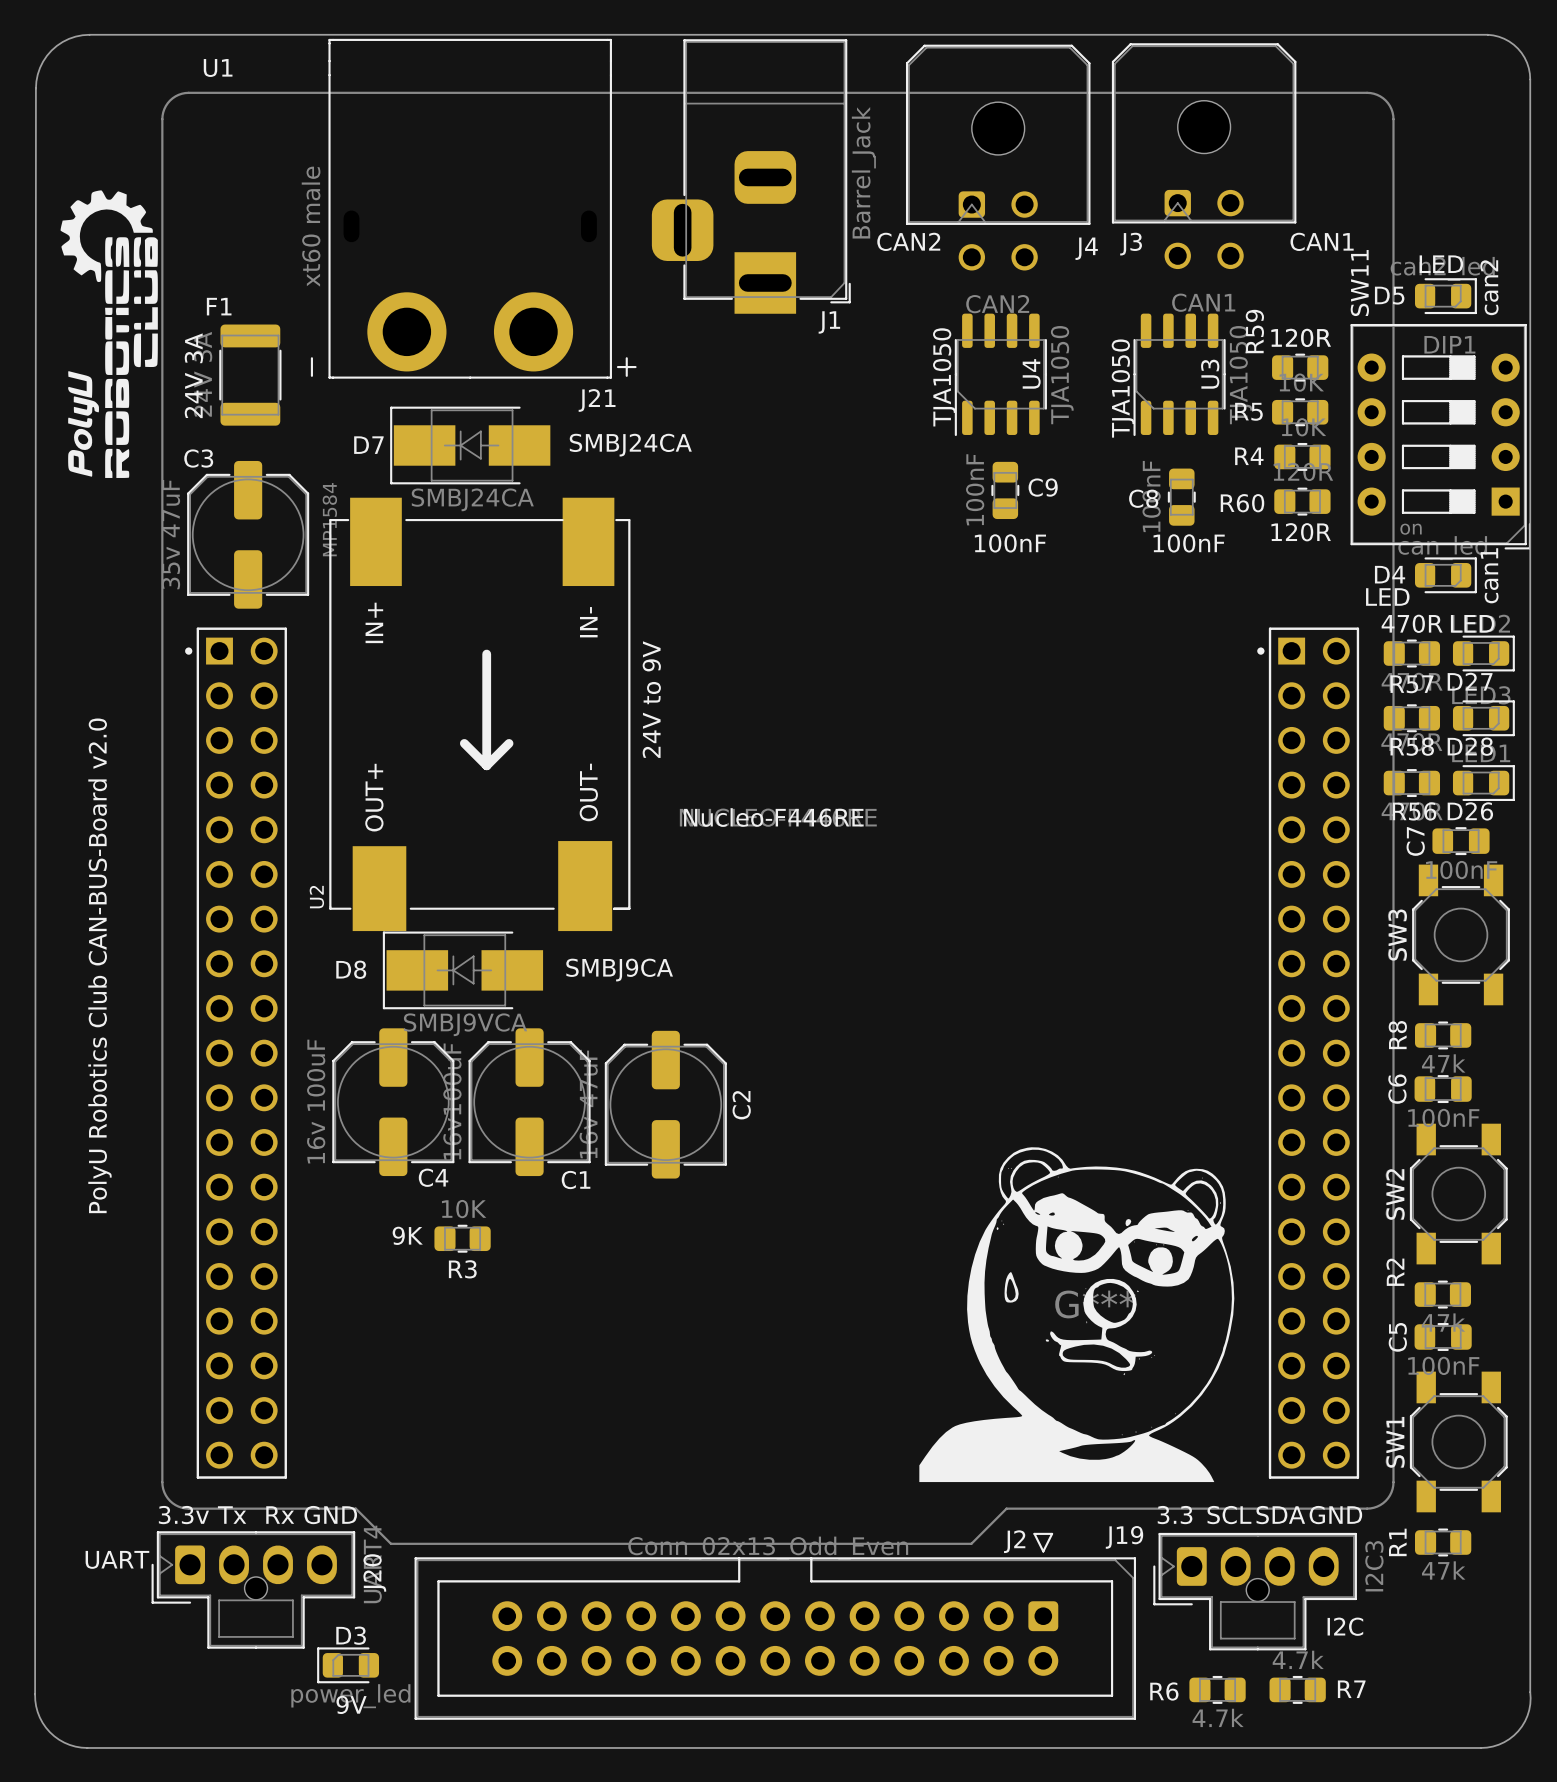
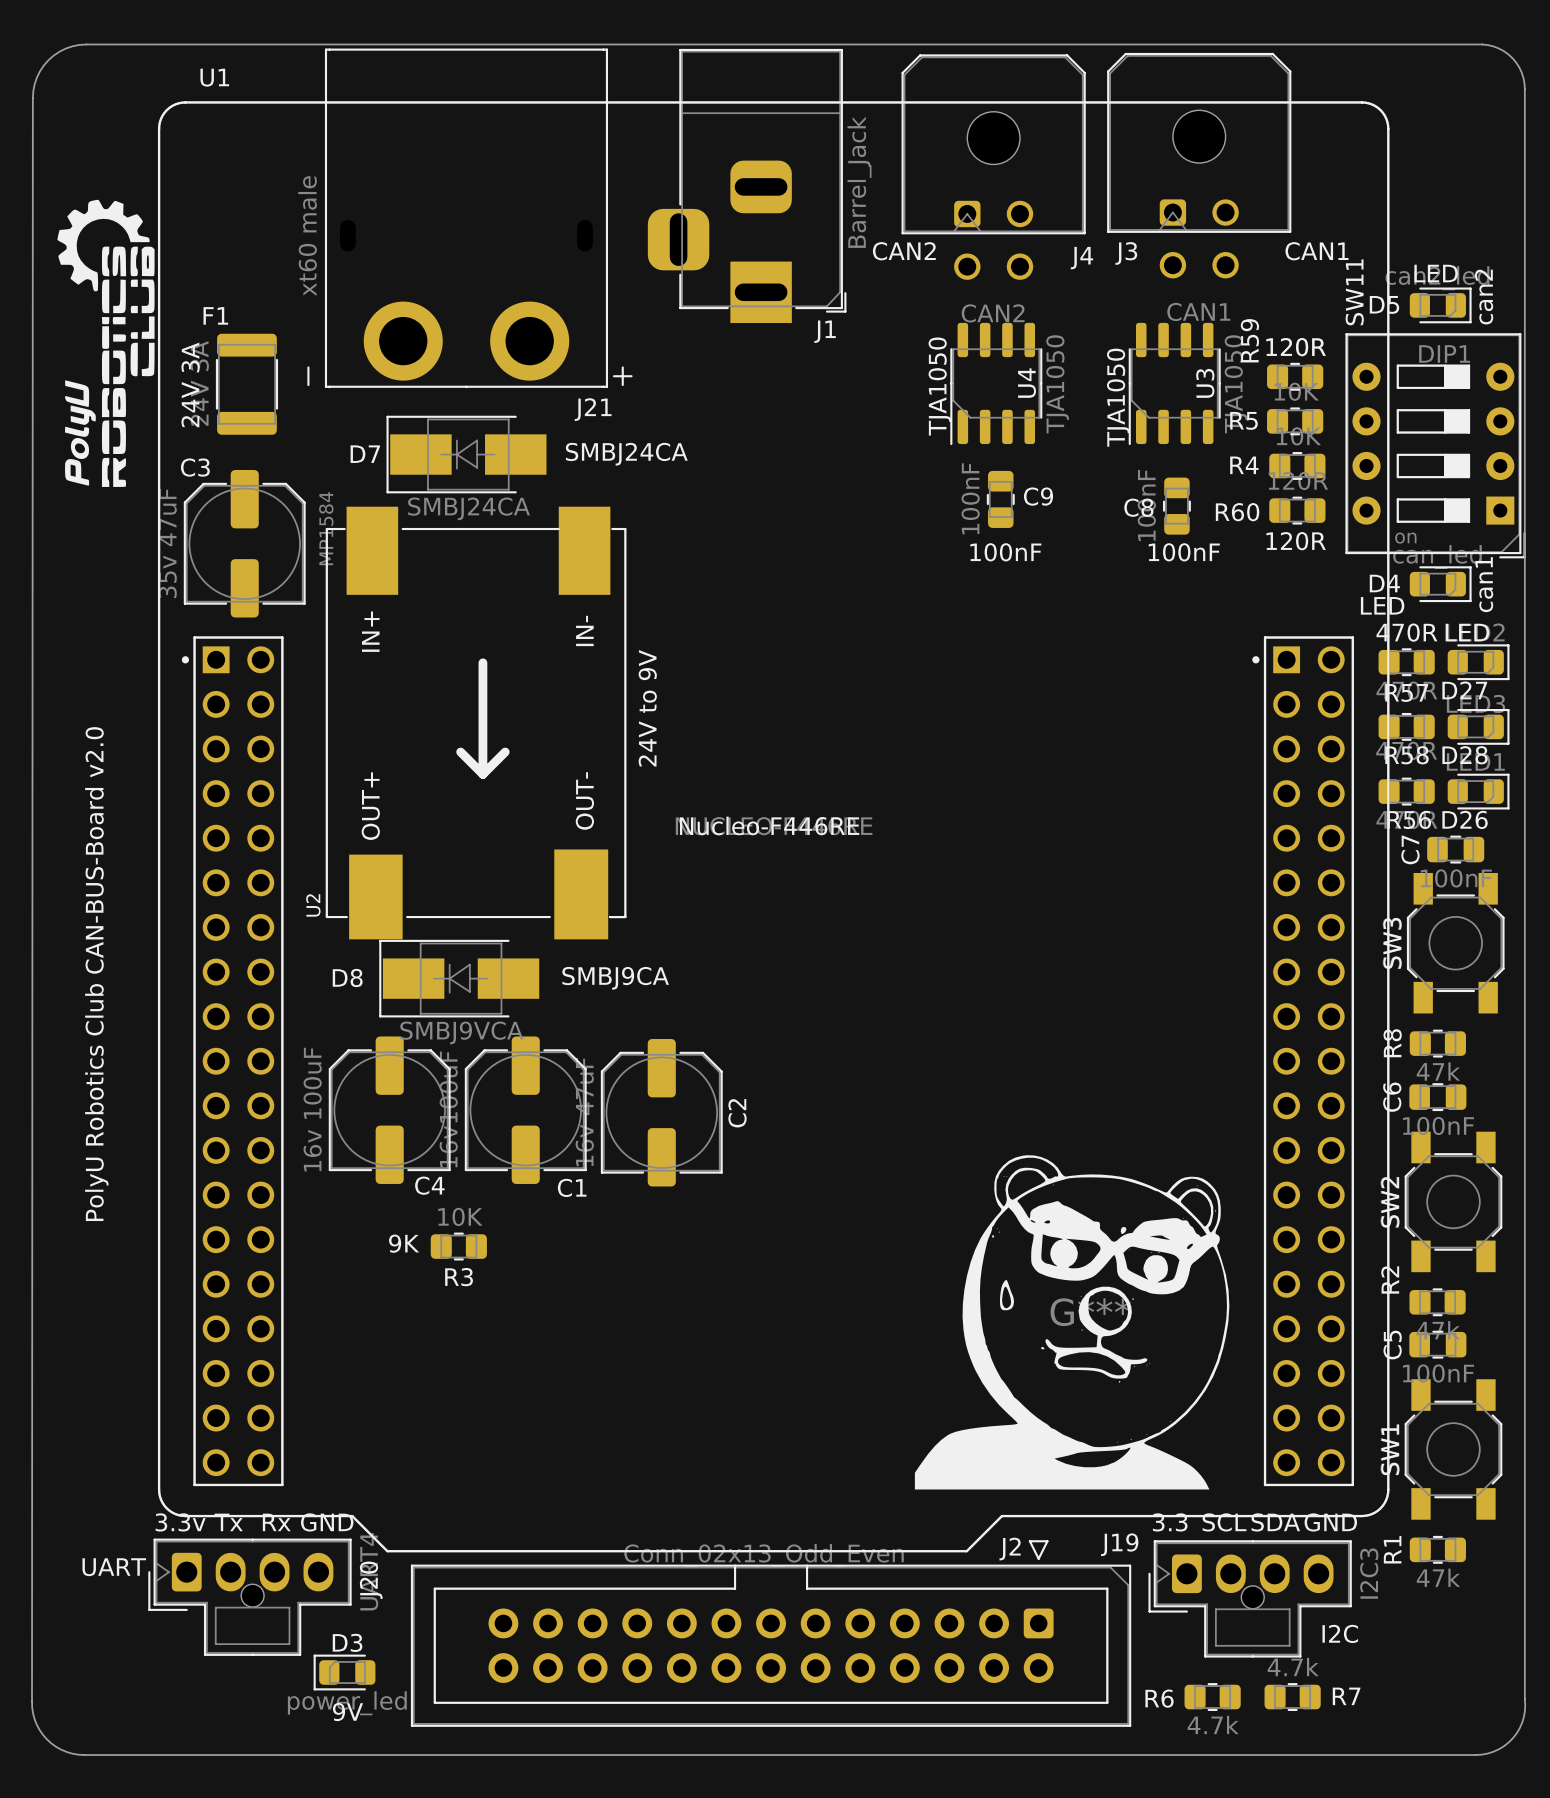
U1 footprint: [161, 91, 1395, 1545] -> [157, 101, 1390, 1553]

